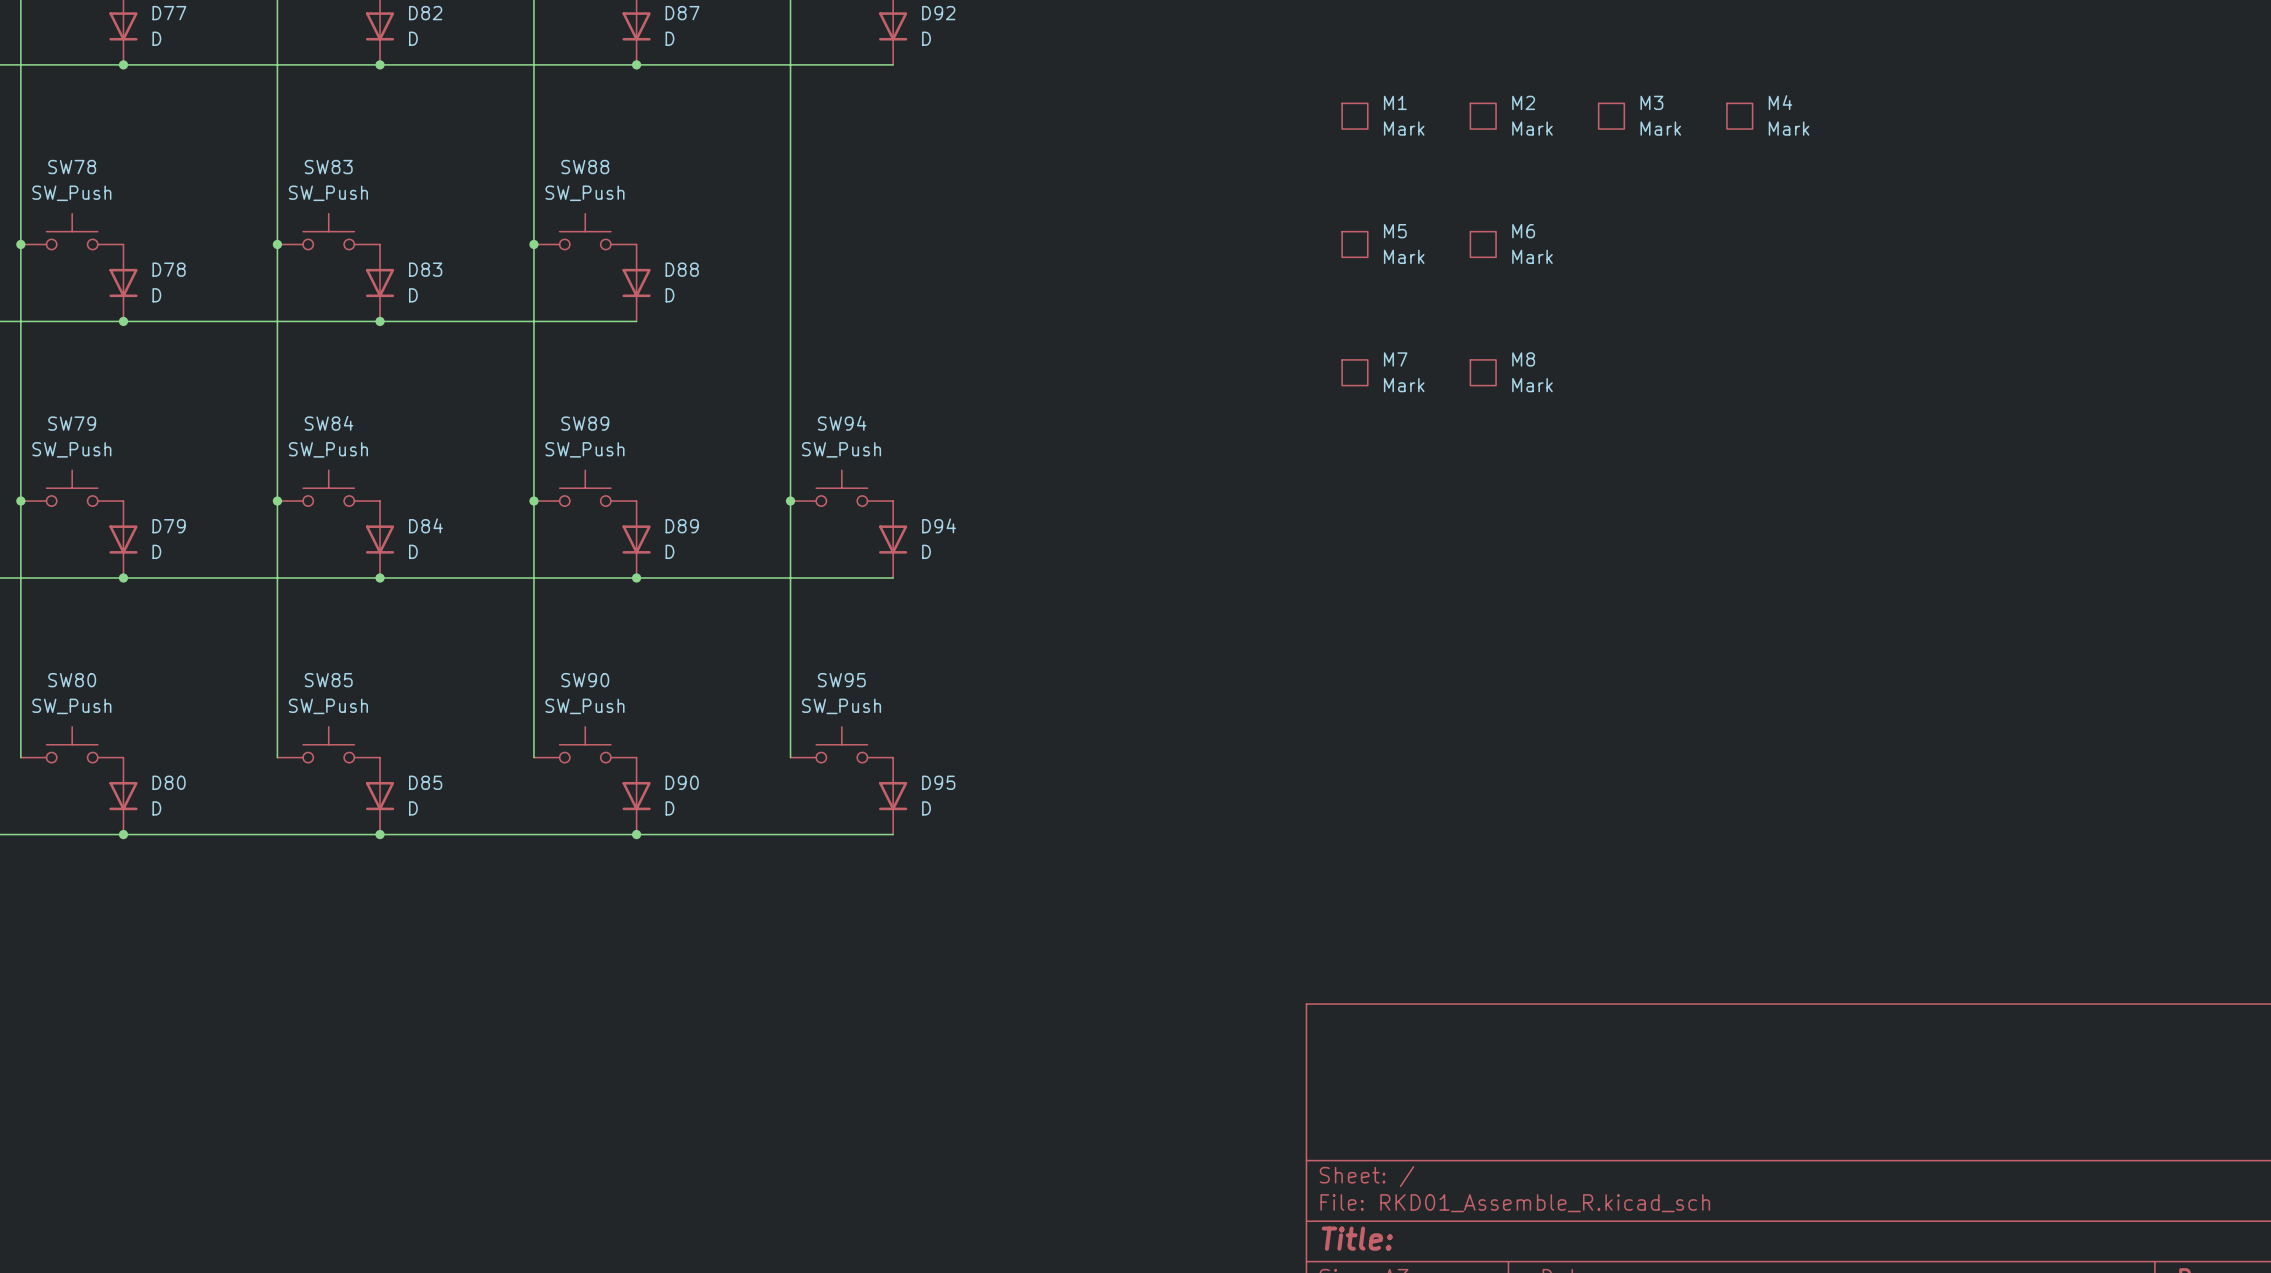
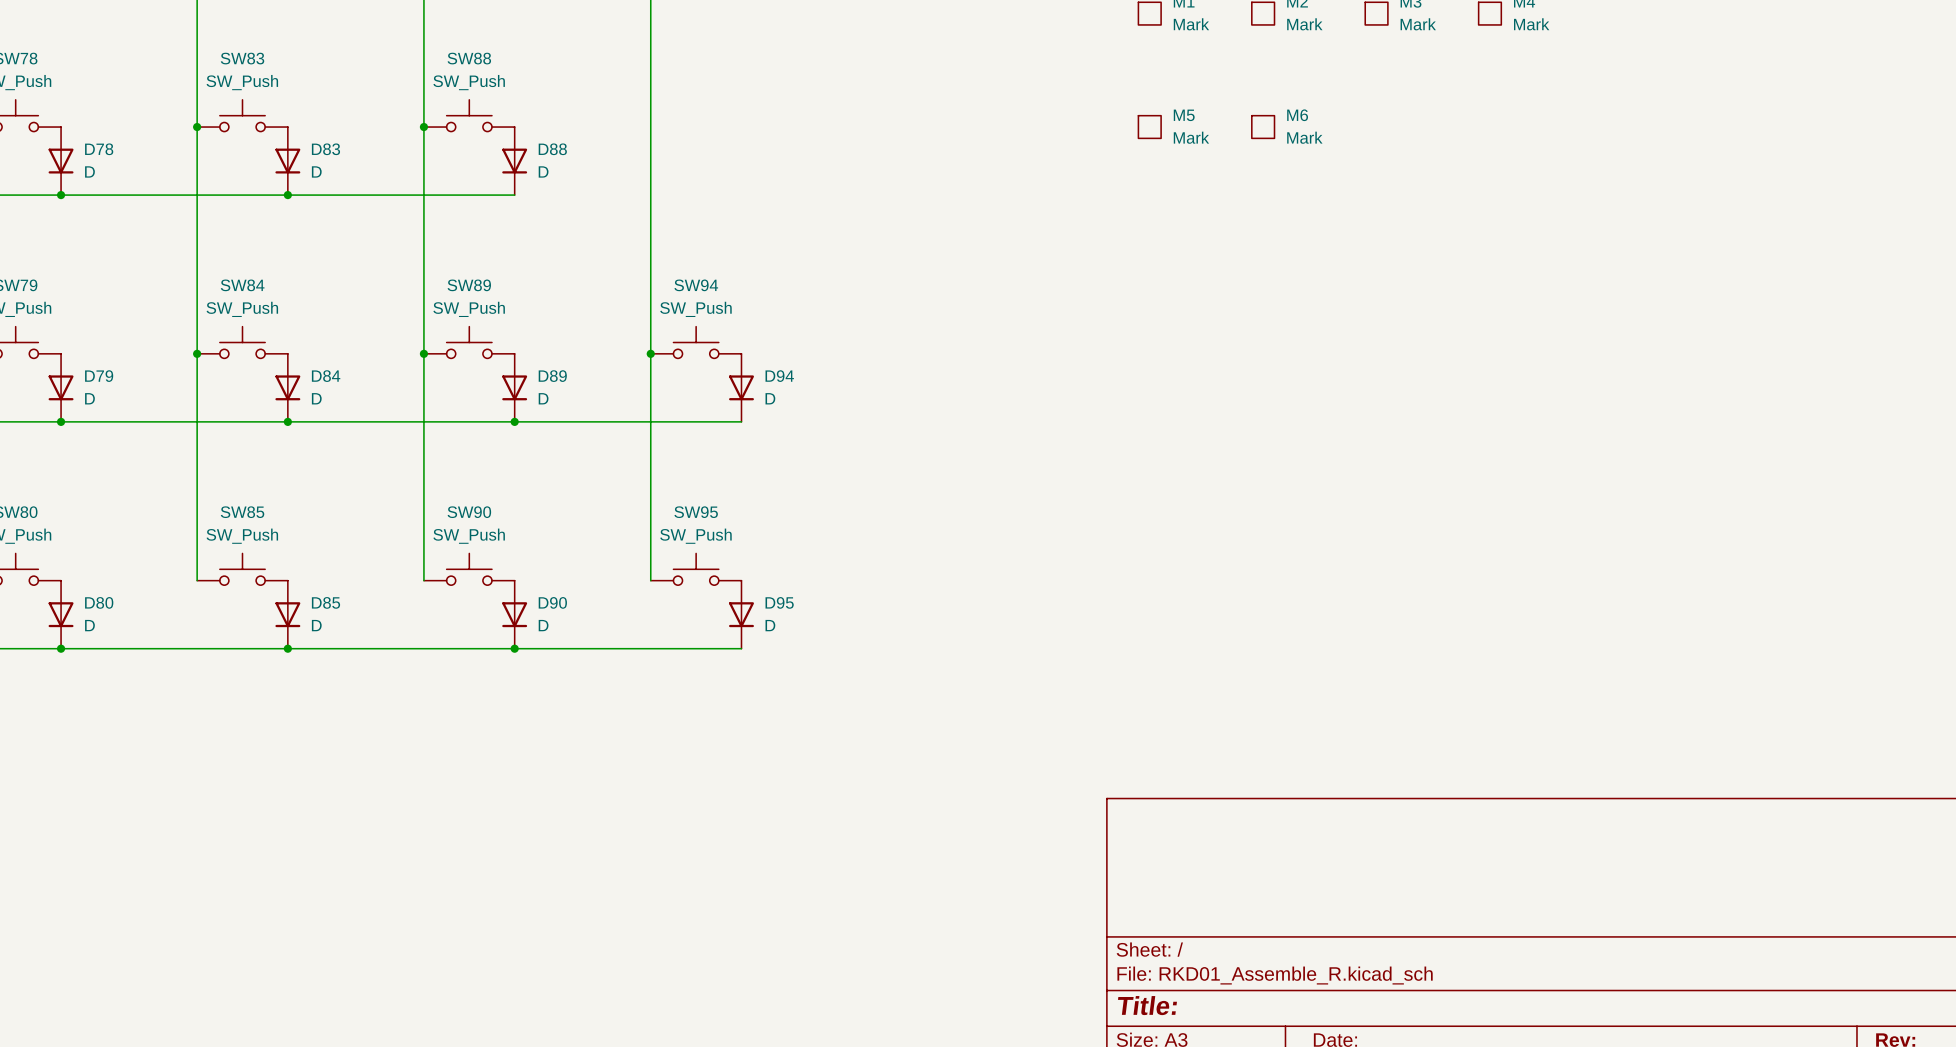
M7: Mark (1354, 372) -> none
M8: Mark (1483, 372) -> none

